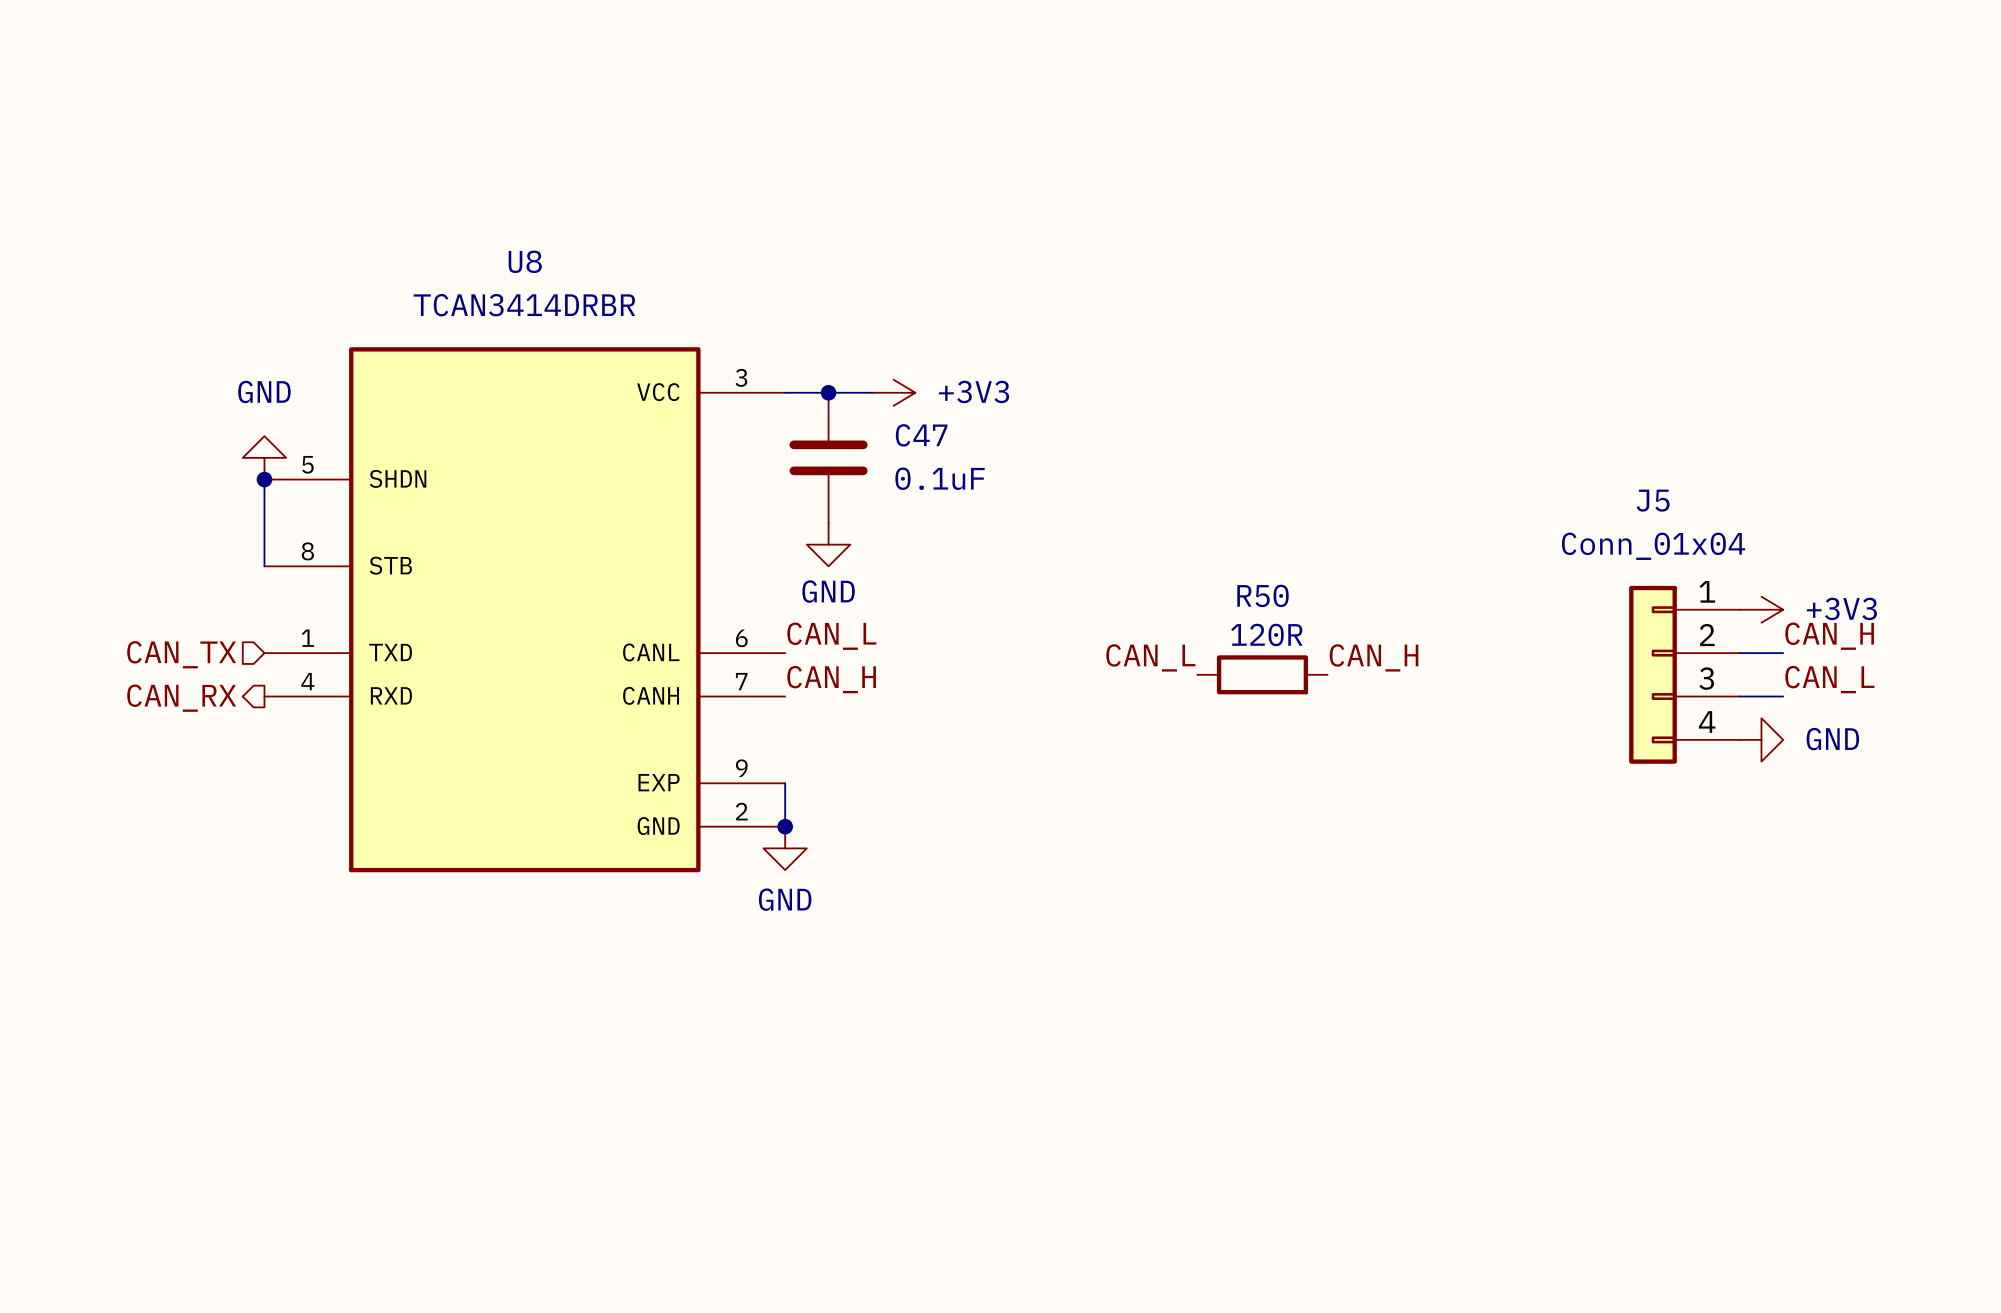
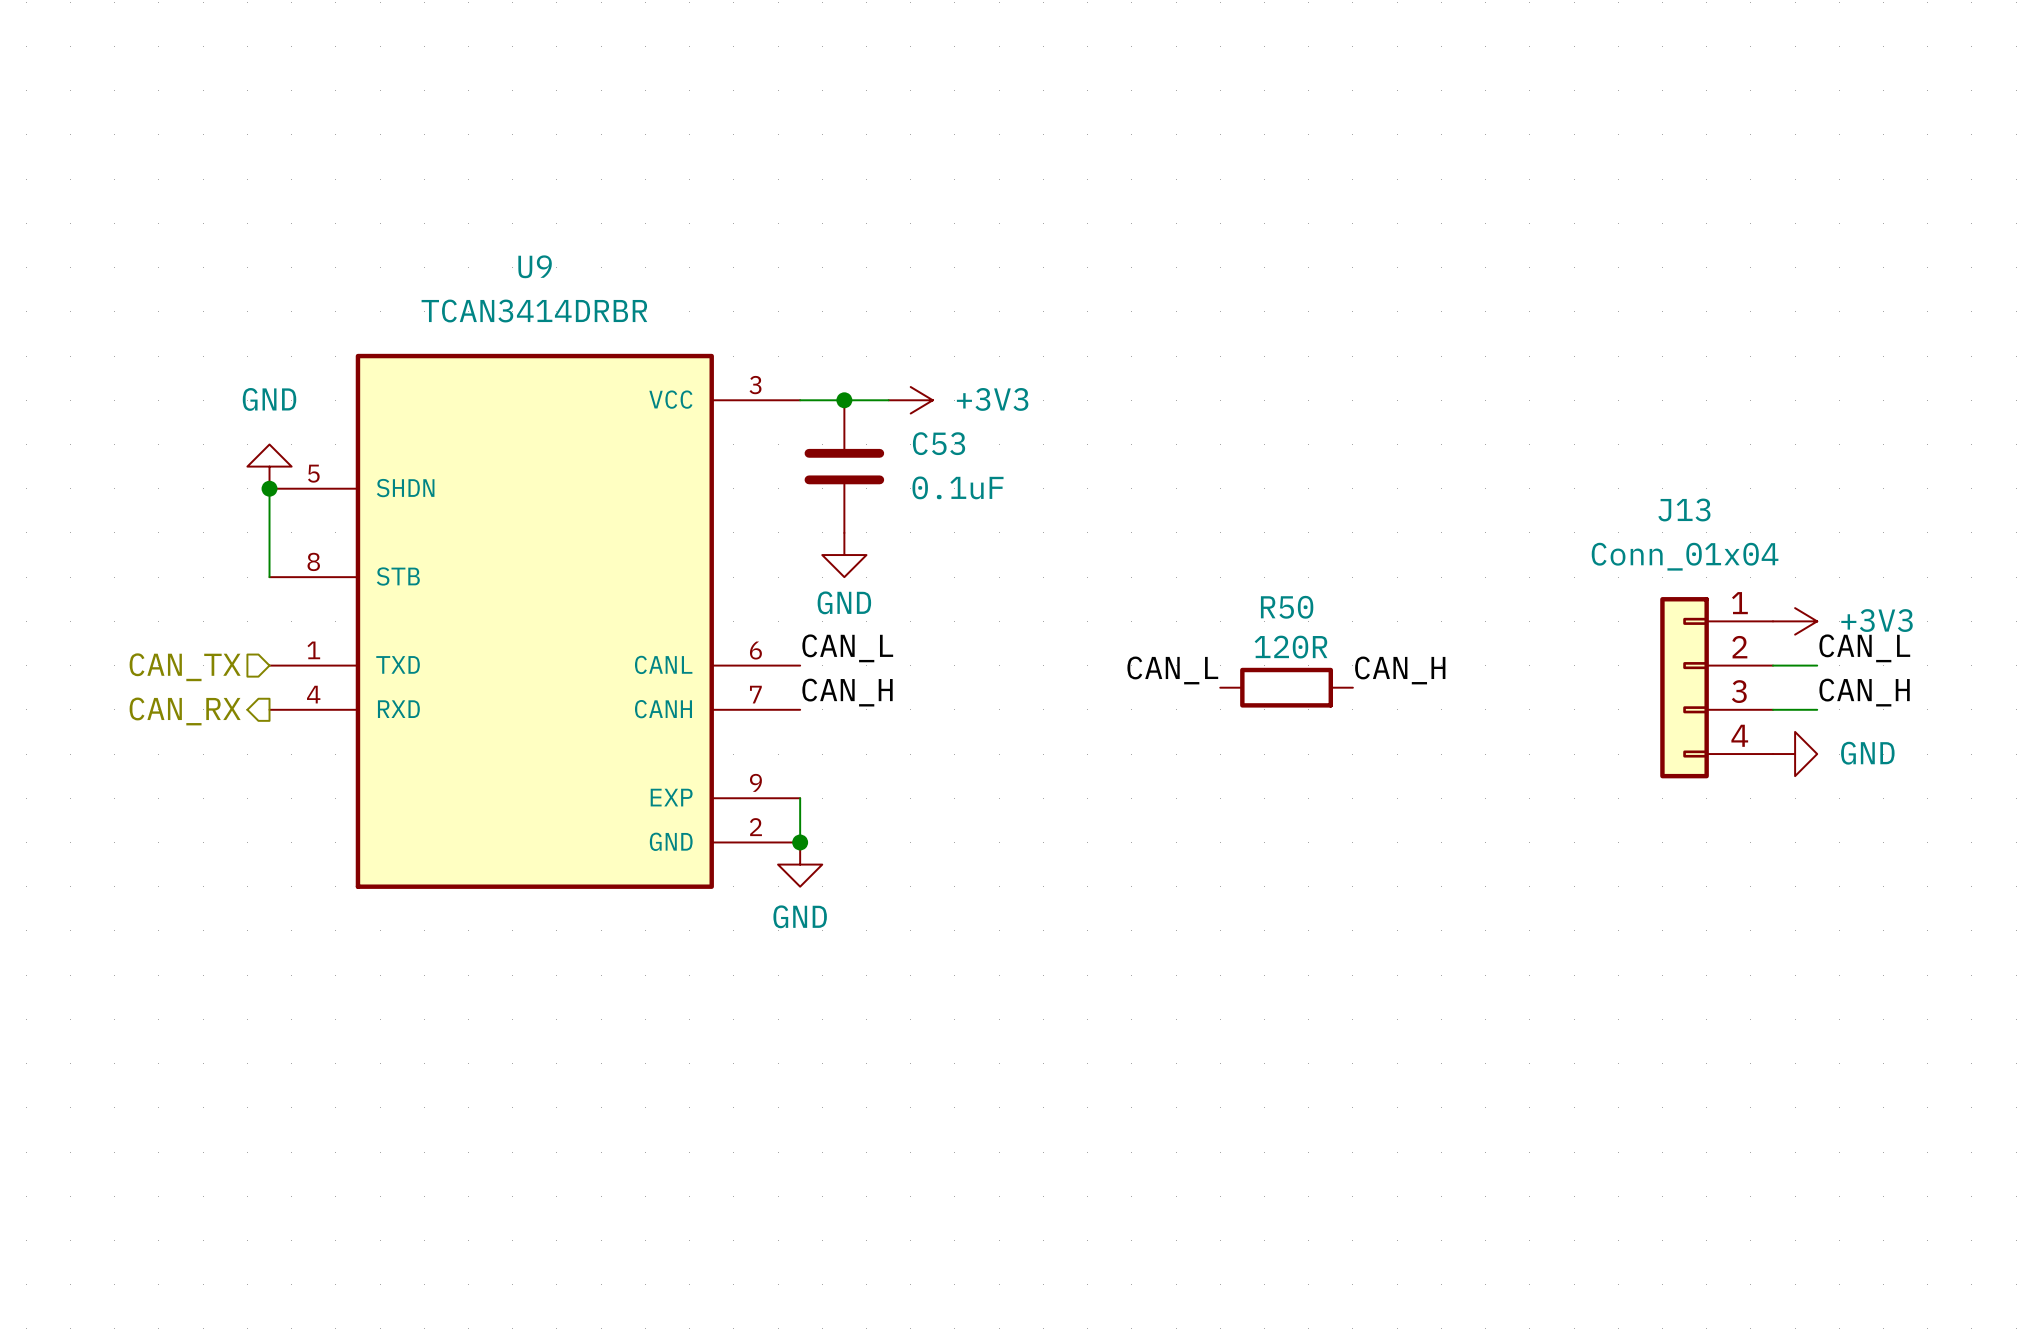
U8 name: U8 (525, 261) -> U9 (535, 266)
C47 name: C47 (921, 435) -> C53 (939, 443)
J5 name: J5 (1653, 500) -> J13 (1684, 509)
label: CAN_H (1829, 636) -> CAN_L (1864, 648)
label: CAN_L (1829, 679) -> CAN_H (1864, 692)

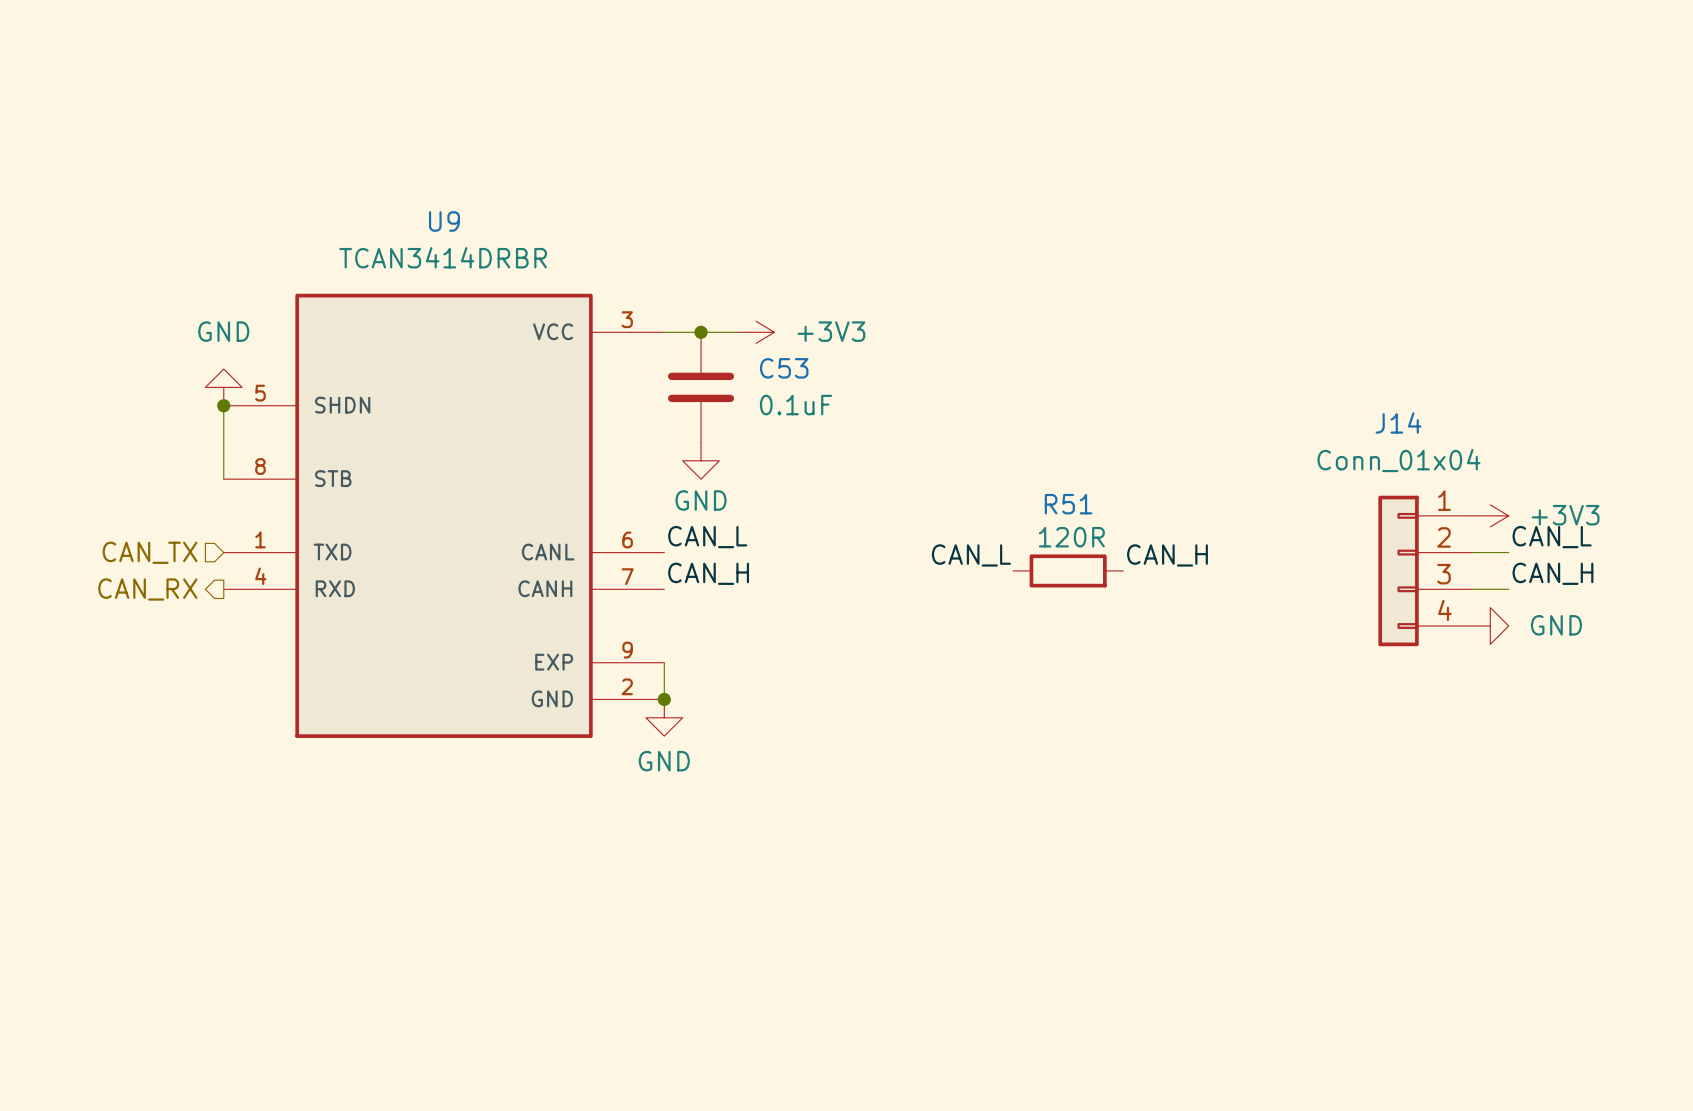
J13 name: J13 (1684, 509) -> J14 (1398, 422)
R50 name: R50 (1287, 607) -> R51 (1068, 504)

